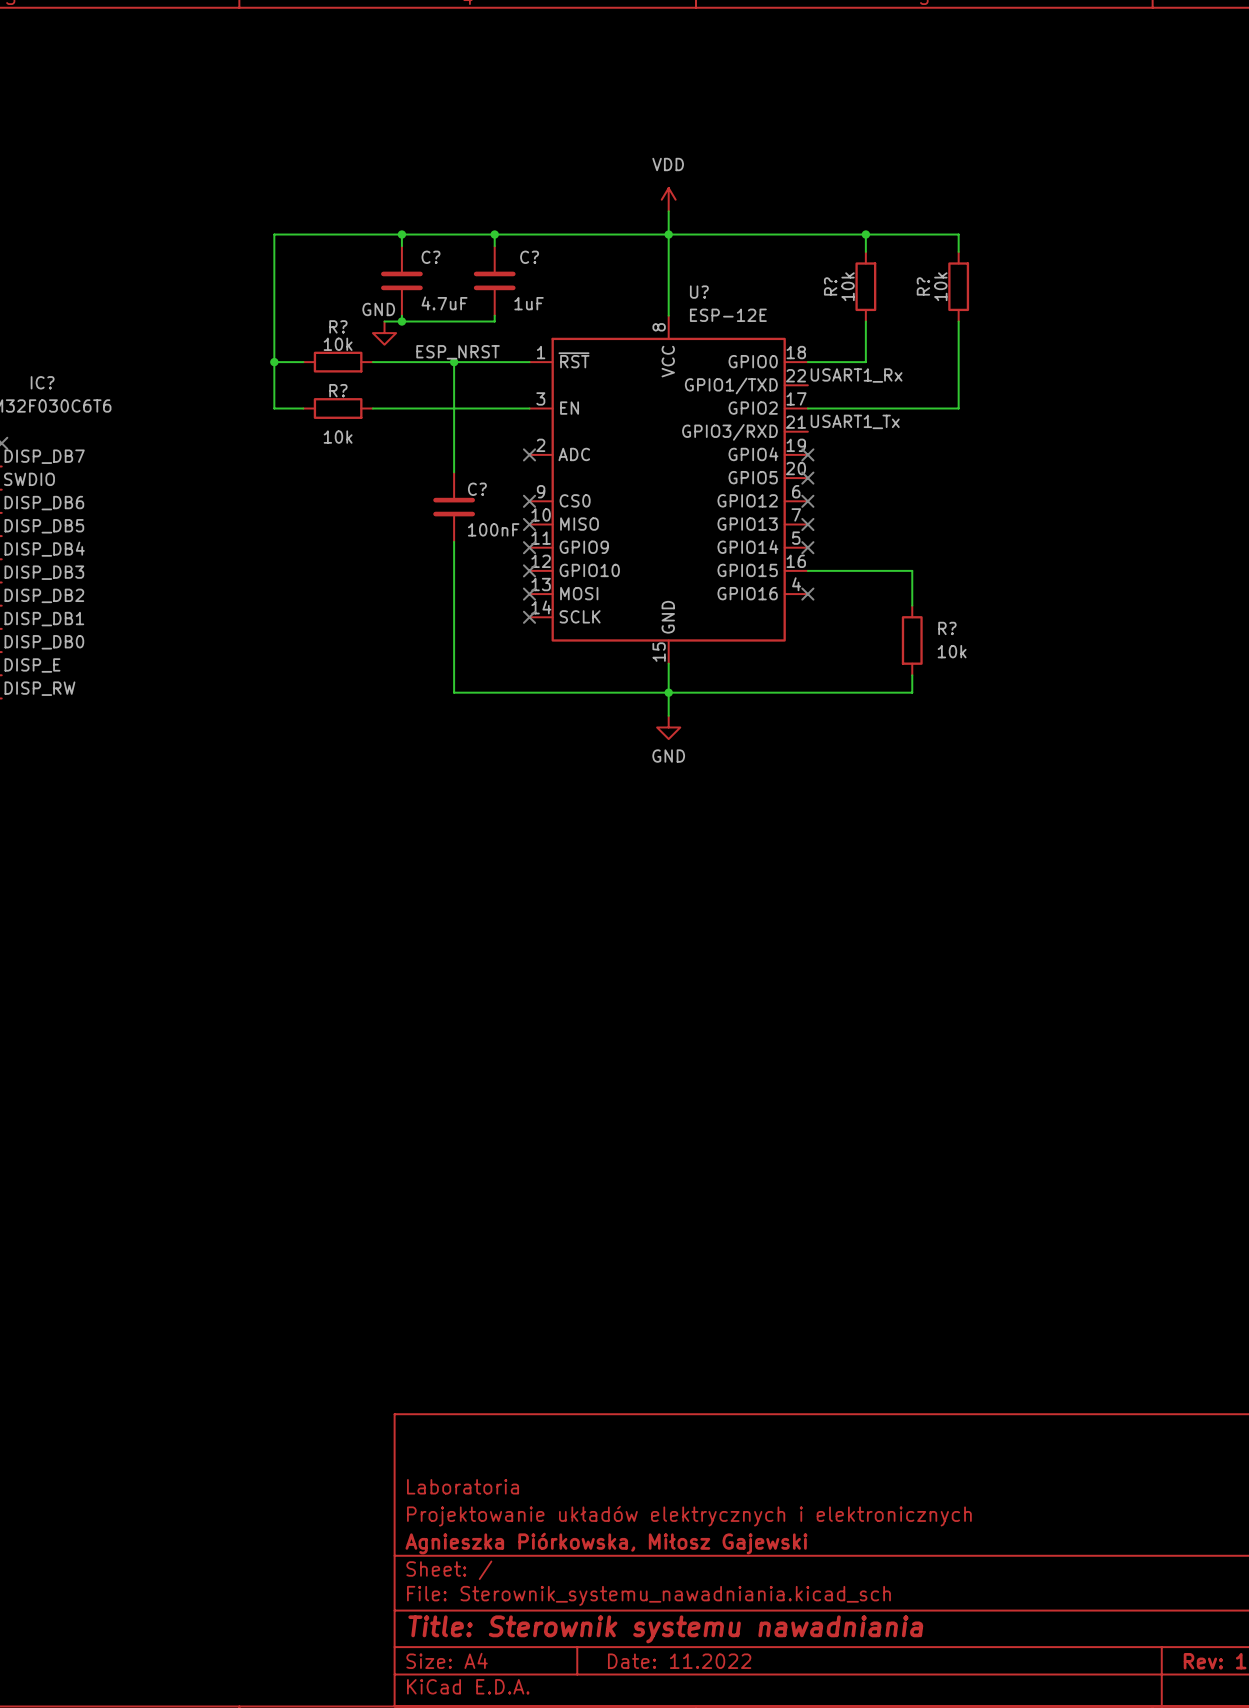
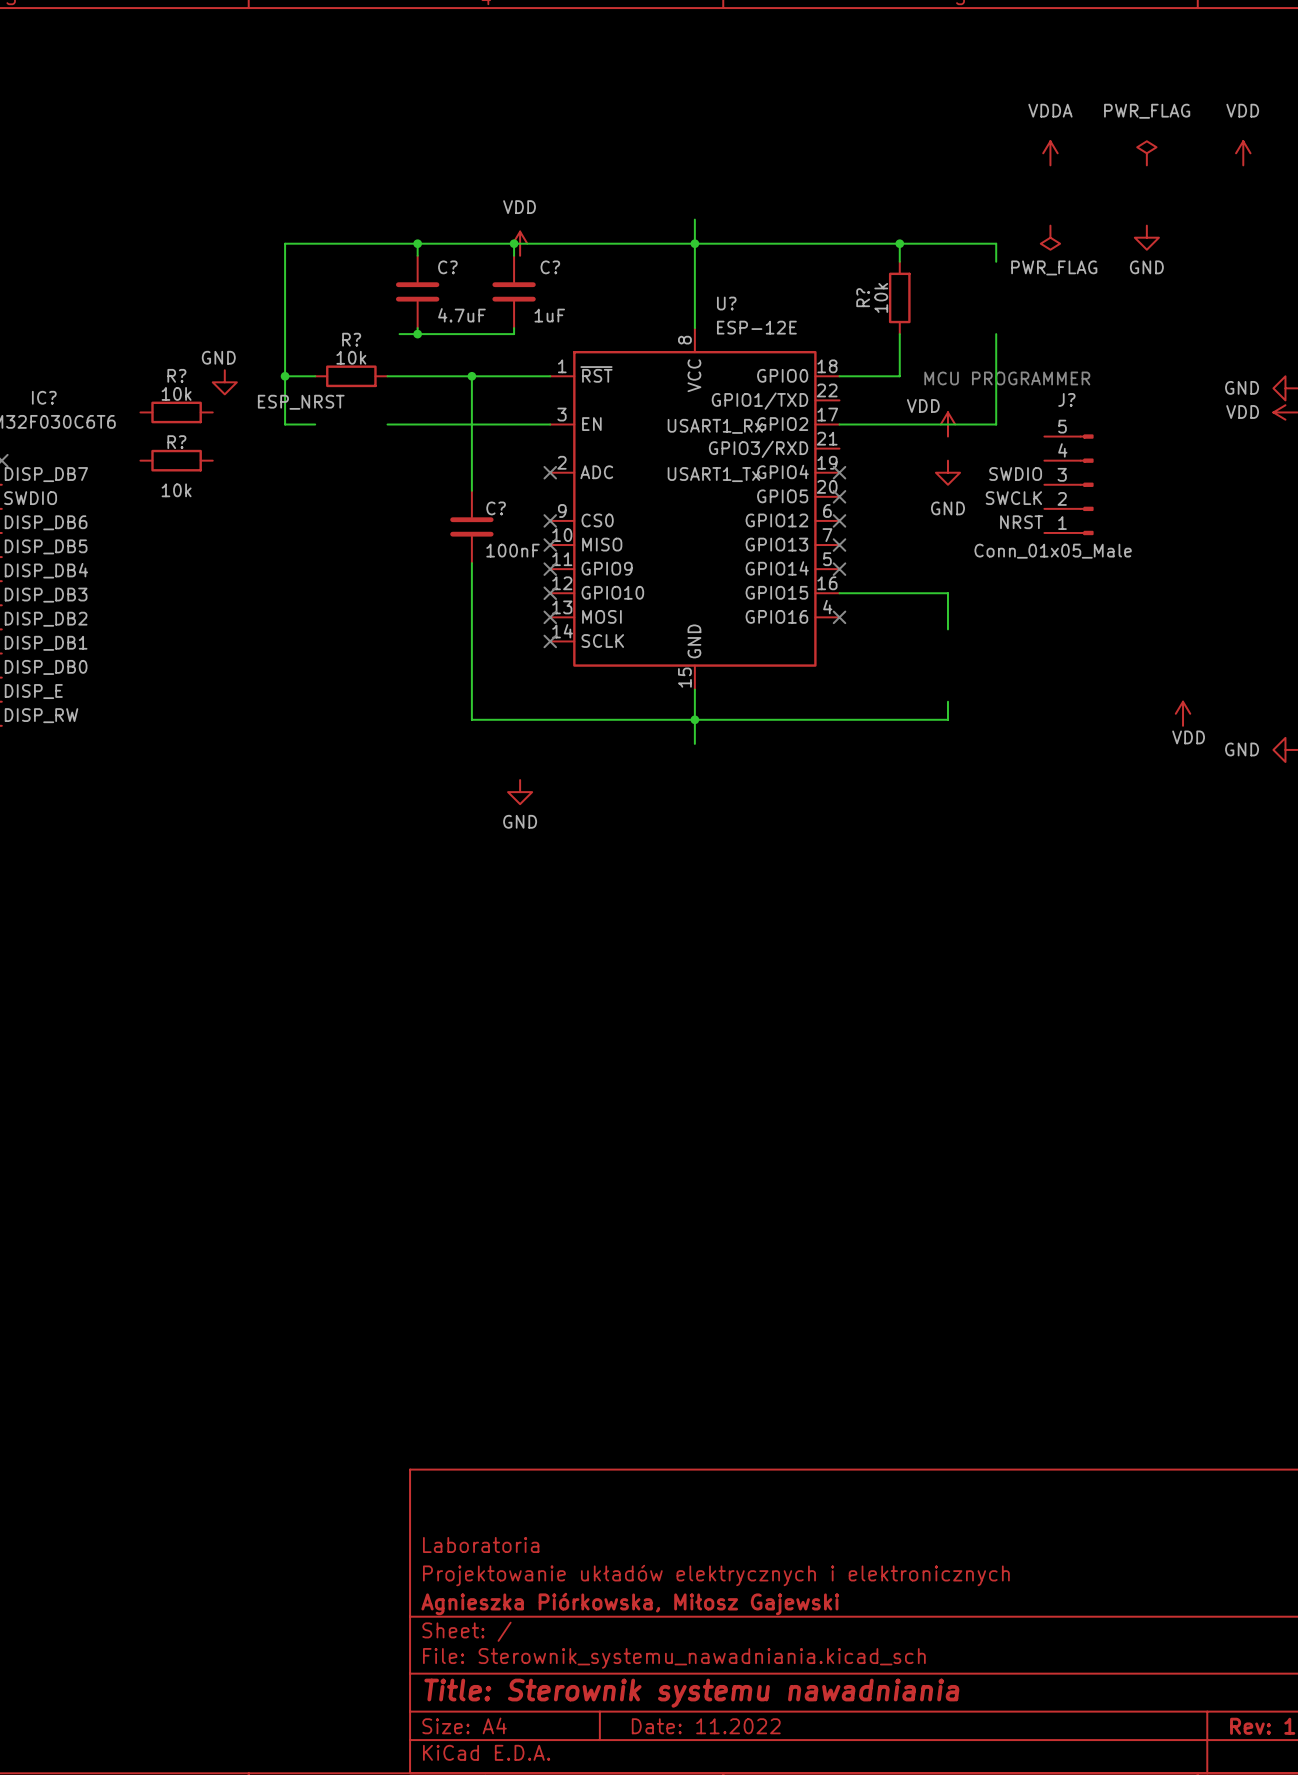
power symbol: none -> VDDA (1050, 153)
power symbol: none -> PWR_FLAG (1146, 153)
power symbol: none -> VDD (1243, 153)
power symbol: VDD (668, 199) -> none
power symbol: none -> PWR_FLAG (1050, 237)
power symbol: none -> GND (1146, 237)
power symbol: none -> VDD (520, 243)
R?: 10k (958, 286) -> none
power symbol position: GND (384, 333) -> GND (224, 382)
label position: ESP_NRST (458, 352) -> ESP_NRST (301, 402)
text: none -> MCU PROGRAMMER (1007, 378)
power symbol: none -> GND (1285, 388)
label position: USART1_Rx (856, 375) -> USART1_Rx (715, 426)
R?: none -> 10k (176, 412)
power symbol: none -> VDD (1285, 412)
R?: 10k (338, 408) -> none
power symbol: none -> VDD (947, 424)
label position: USART1_Tx (855, 421) -> USART1_Tx (713, 474)
R?: none -> 10k (176, 460)
power symbol: none -> GND (947, 472)
label: none -> SWDIO (1015, 474)
J?: none -> Conn_01x05_Male (1068, 484)
label: none -> SWCLK (1013, 498)
label: none -> NRST (1021, 522)
R?: 10k (912, 640) -> none
power symbol: none -> VDD (1183, 713)
power symbol: none -> GND (1285, 749)
power symbol position: GND (668, 727) -> GND (520, 792)

